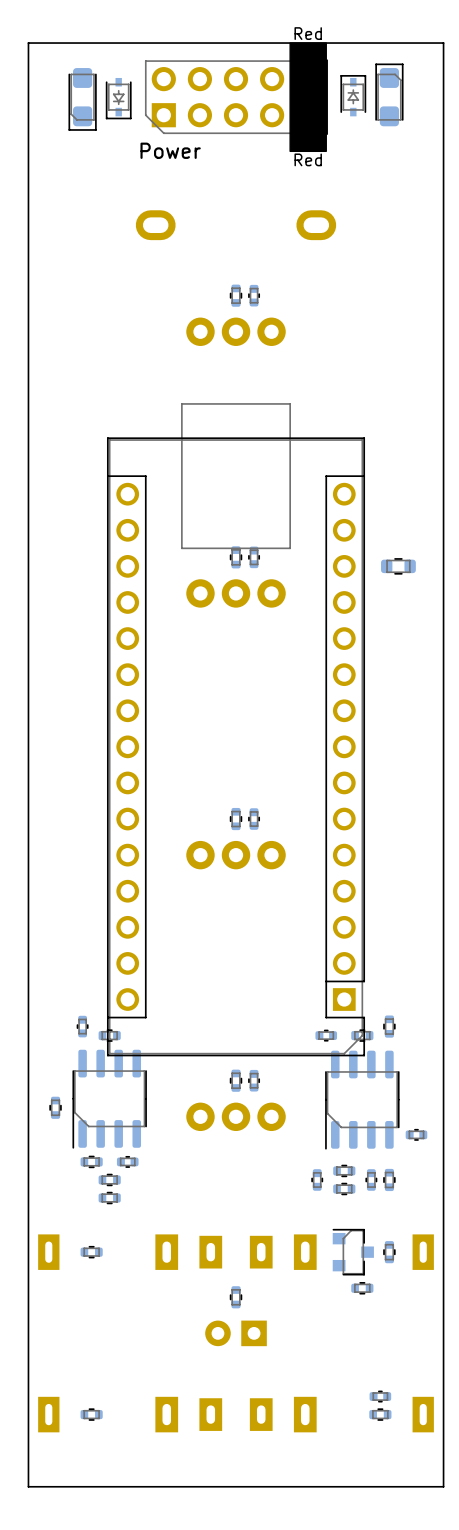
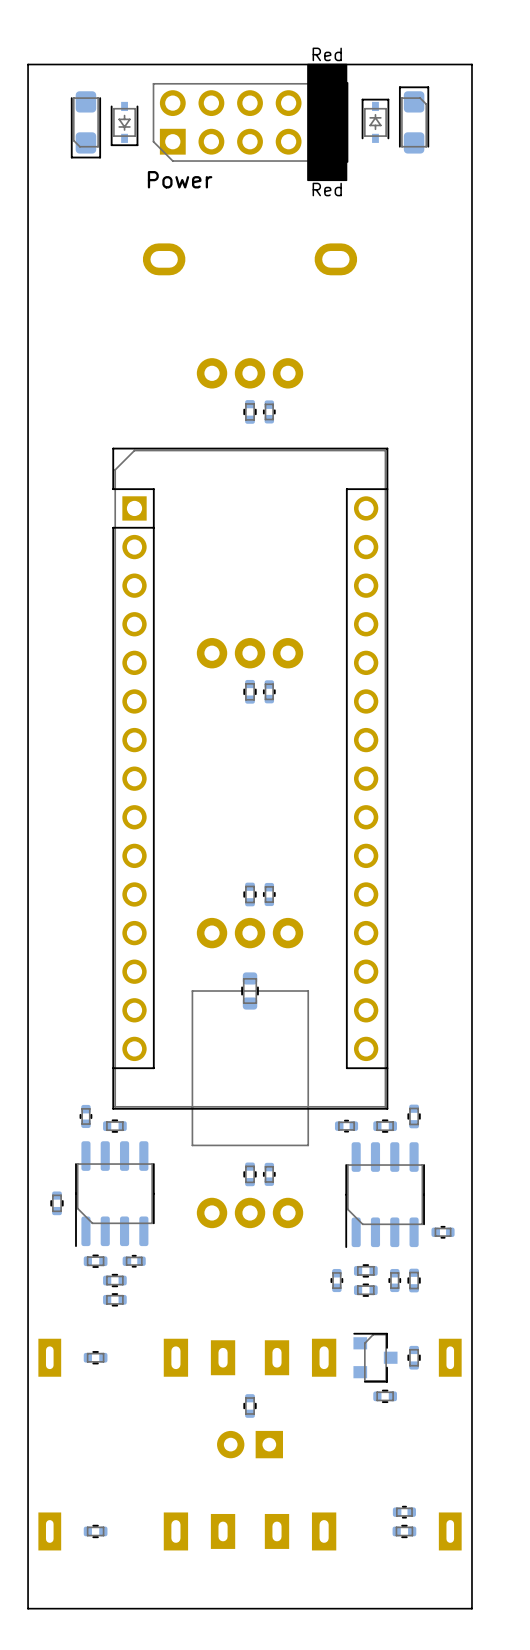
part position: (236, 295) -> (250, 411)
part position: (254, 295) -> (269, 411)
part position: (236, 557) -> (250, 691)
part position: (254, 557) -> (269, 691)
part: (398, 566) -> none
part rotation: 0° (236, 729) -> 180° (250, 796)
part: none -> (250, 991)

